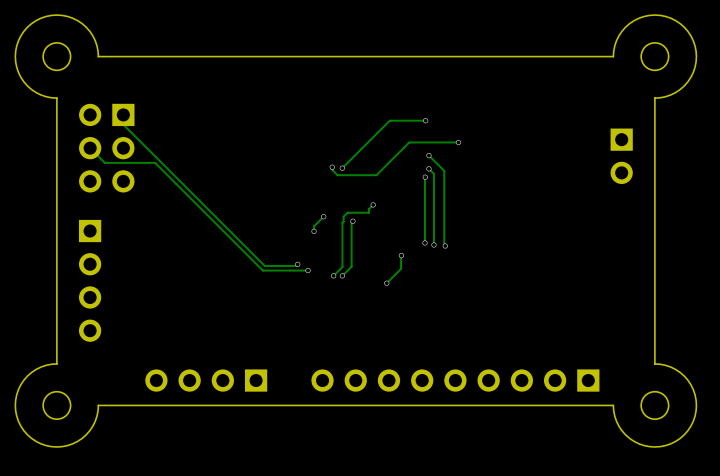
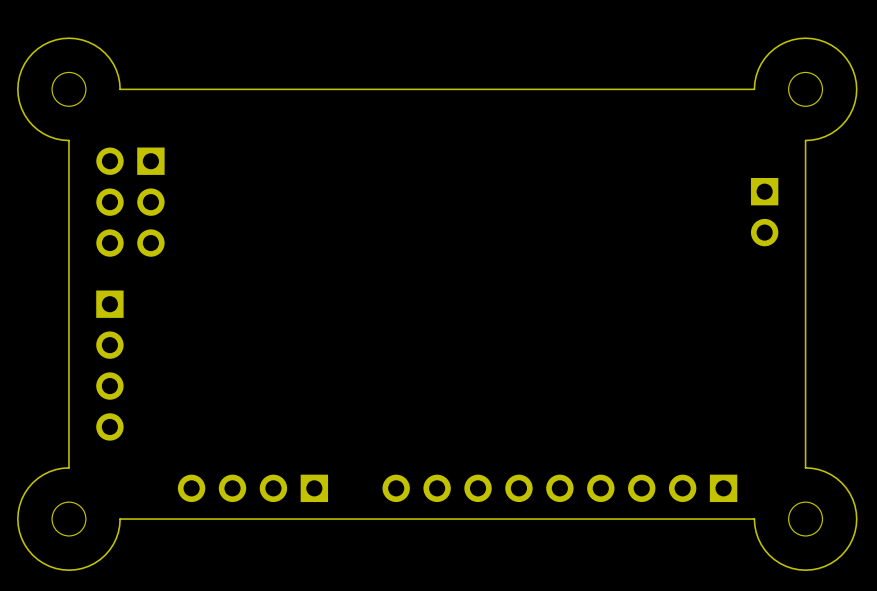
track: (123, 114) (123, 124) (264, 265) (296, 265) (297, 264) -> none
track: (425, 120) (389, 120) (342, 168) -> none
via: (425, 120) -> none
track: (458, 142) (409, 142) (376, 175) (337, 175) (332, 167) -> none
via: (458, 142) -> none
track: (90, 148) (104, 162) (155, 162) (262, 270) (308, 270) -> none
track: (428, 155) (444, 170) (445, 245) -> none
via: (428, 155) -> none
via: (332, 167) -> none
via: (342, 168) -> none
track: (428, 168) (433, 173) (433, 244) -> none
via: (428, 168) -> none
track: (425, 177) (424, 242) -> none
via: (425, 177) -> none
track: (373, 204) (368, 209) (368, 212) (347, 212) (343, 216) (342, 267) (333, 275) -> none
via: (373, 204) -> none
track: (323, 216) (314, 226) (314, 231) -> none
via: (323, 216) -> none
track: (352, 221) (351, 266) (342, 275) -> none
via: (352, 221) -> none
via: (314, 231) -> none
via: (424, 242) -> none
via: (433, 244) -> none
via: (445, 245) -> none
track: (401, 255) (401, 268) (386, 283) -> none
via: (401, 255) -> none
via: (297, 264) -> none
via: (308, 270) -> none
via: (333, 275) -> none
via: (342, 275) -> none
via: (386, 283) -> none

